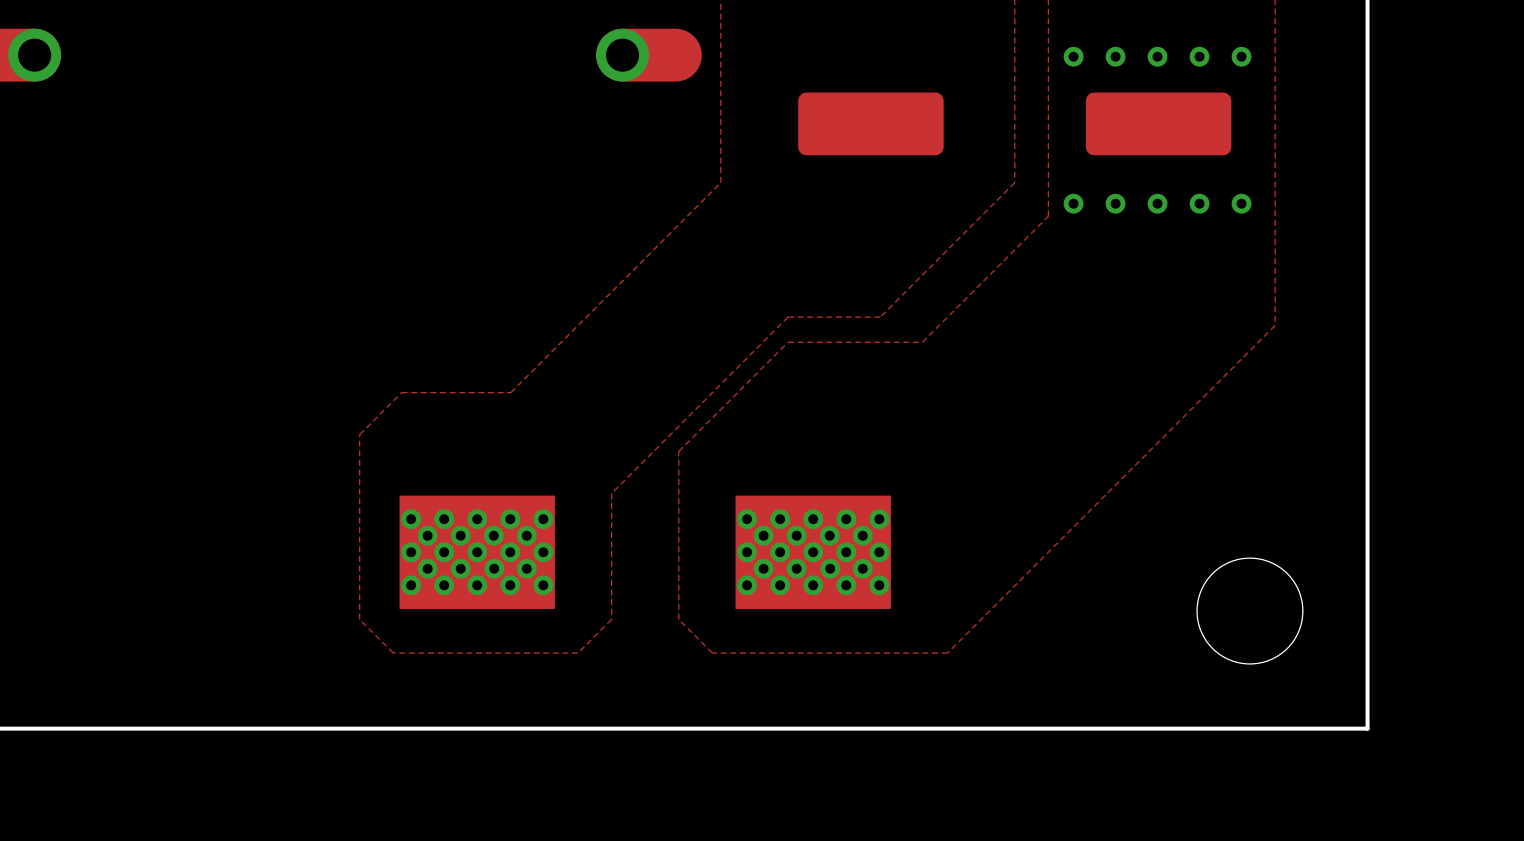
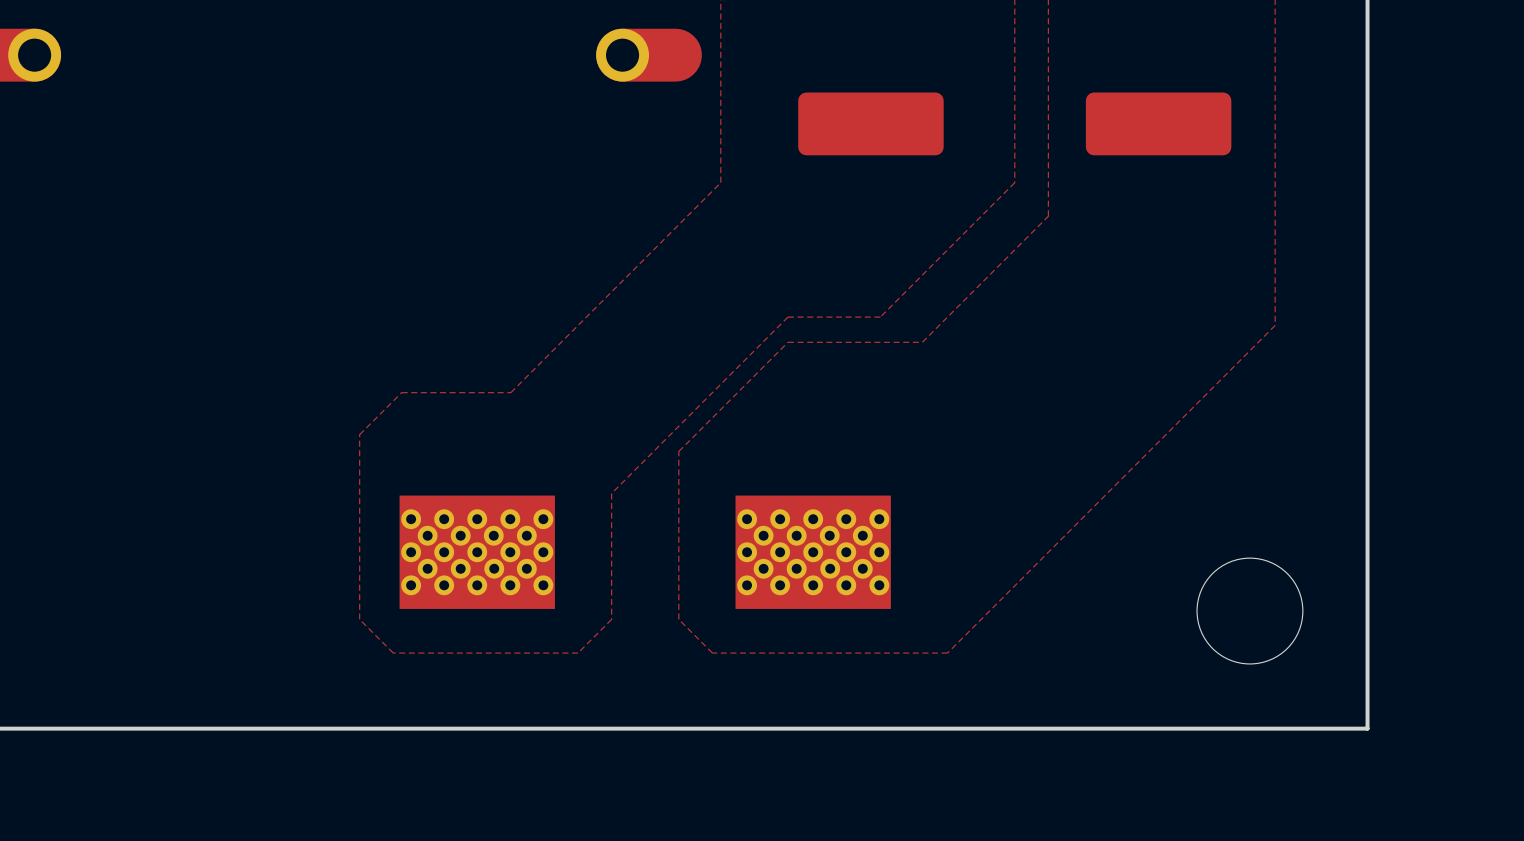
via: (1073, 56) -> none
via: (1115, 56) -> none
via: (1157, 56) -> none
via: (1199, 56) -> none
via: (1241, 56) -> none
via: (1073, 203) -> none
via: (1115, 203) -> none
via: (1157, 203) -> none
via: (1199, 203) -> none
via: (1241, 203) -> none

